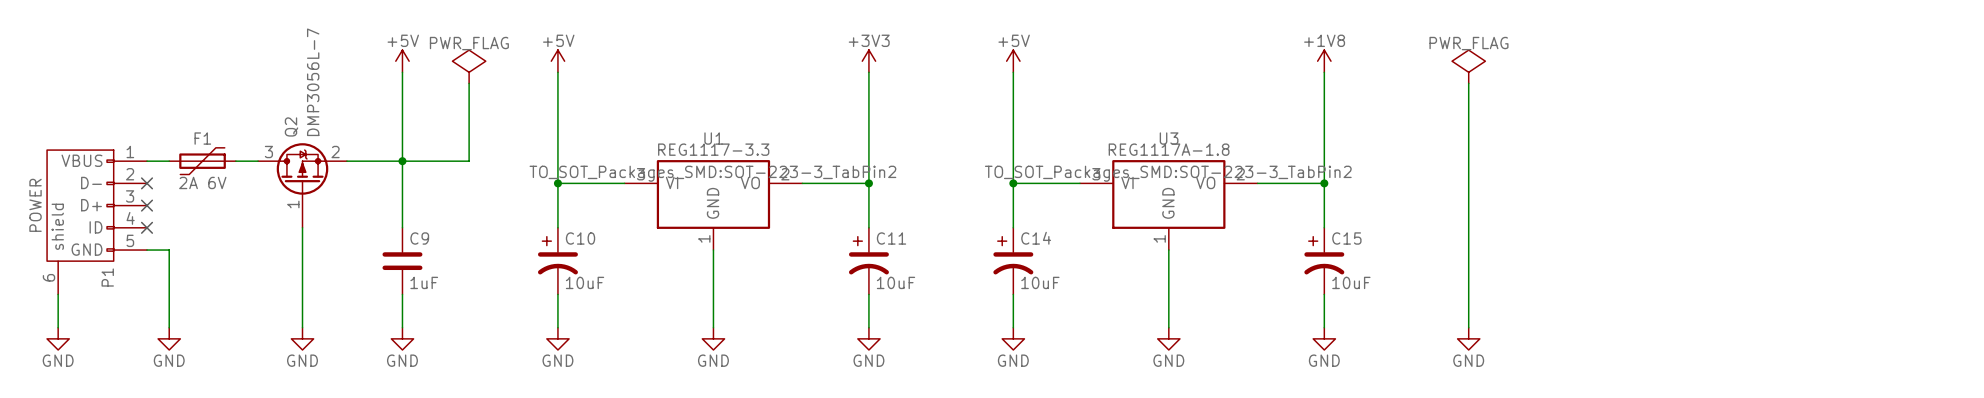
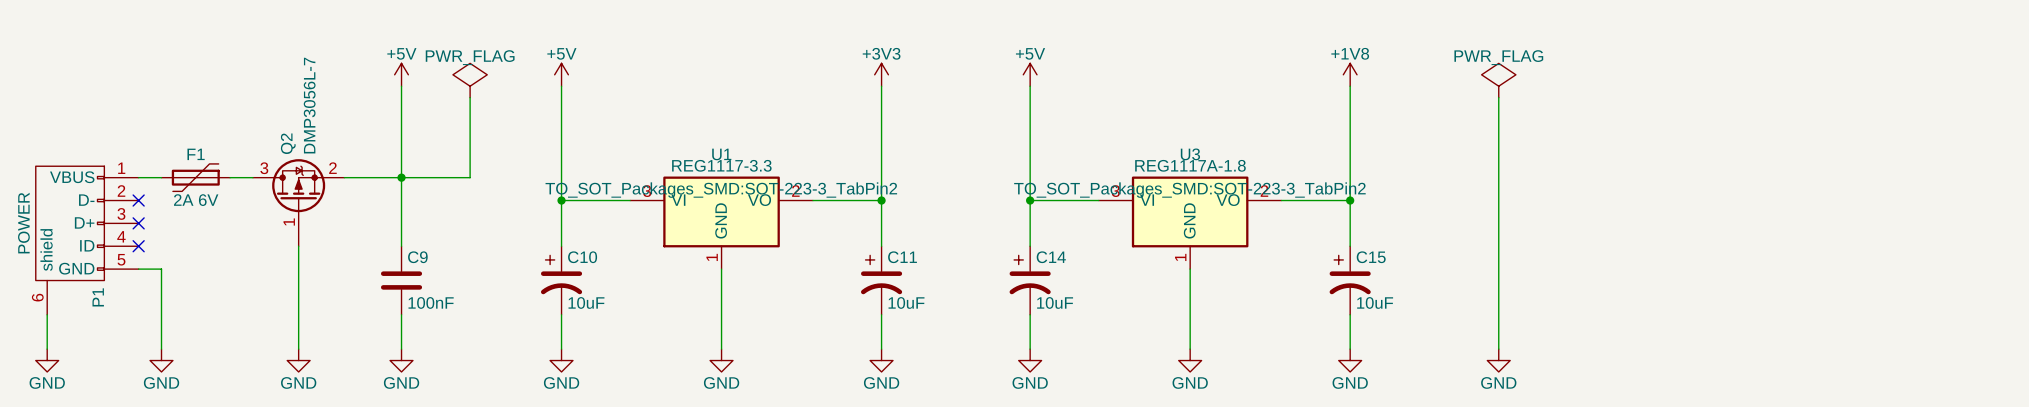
C9 value: 1uF (424, 282) -> 100nF (431, 302)

